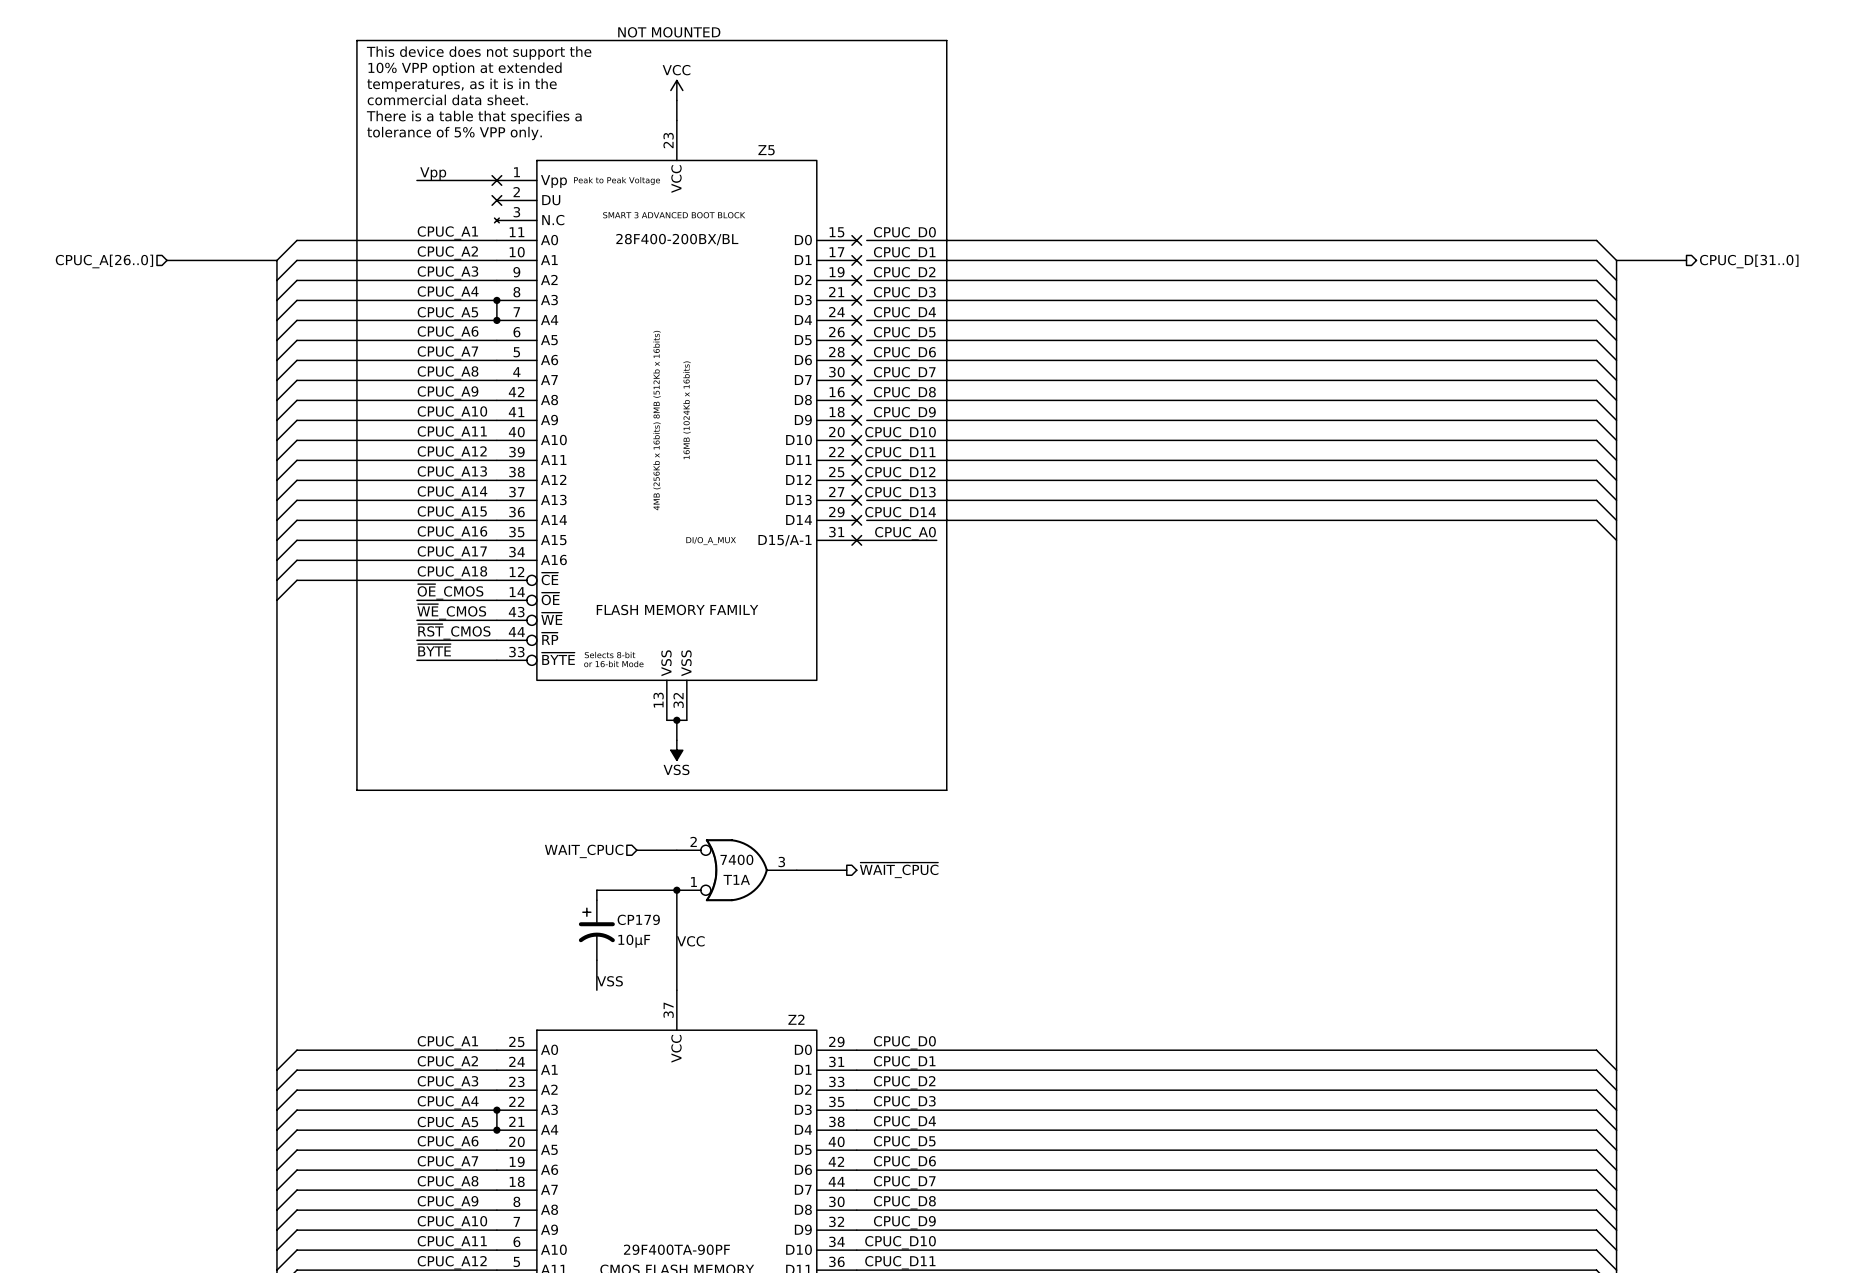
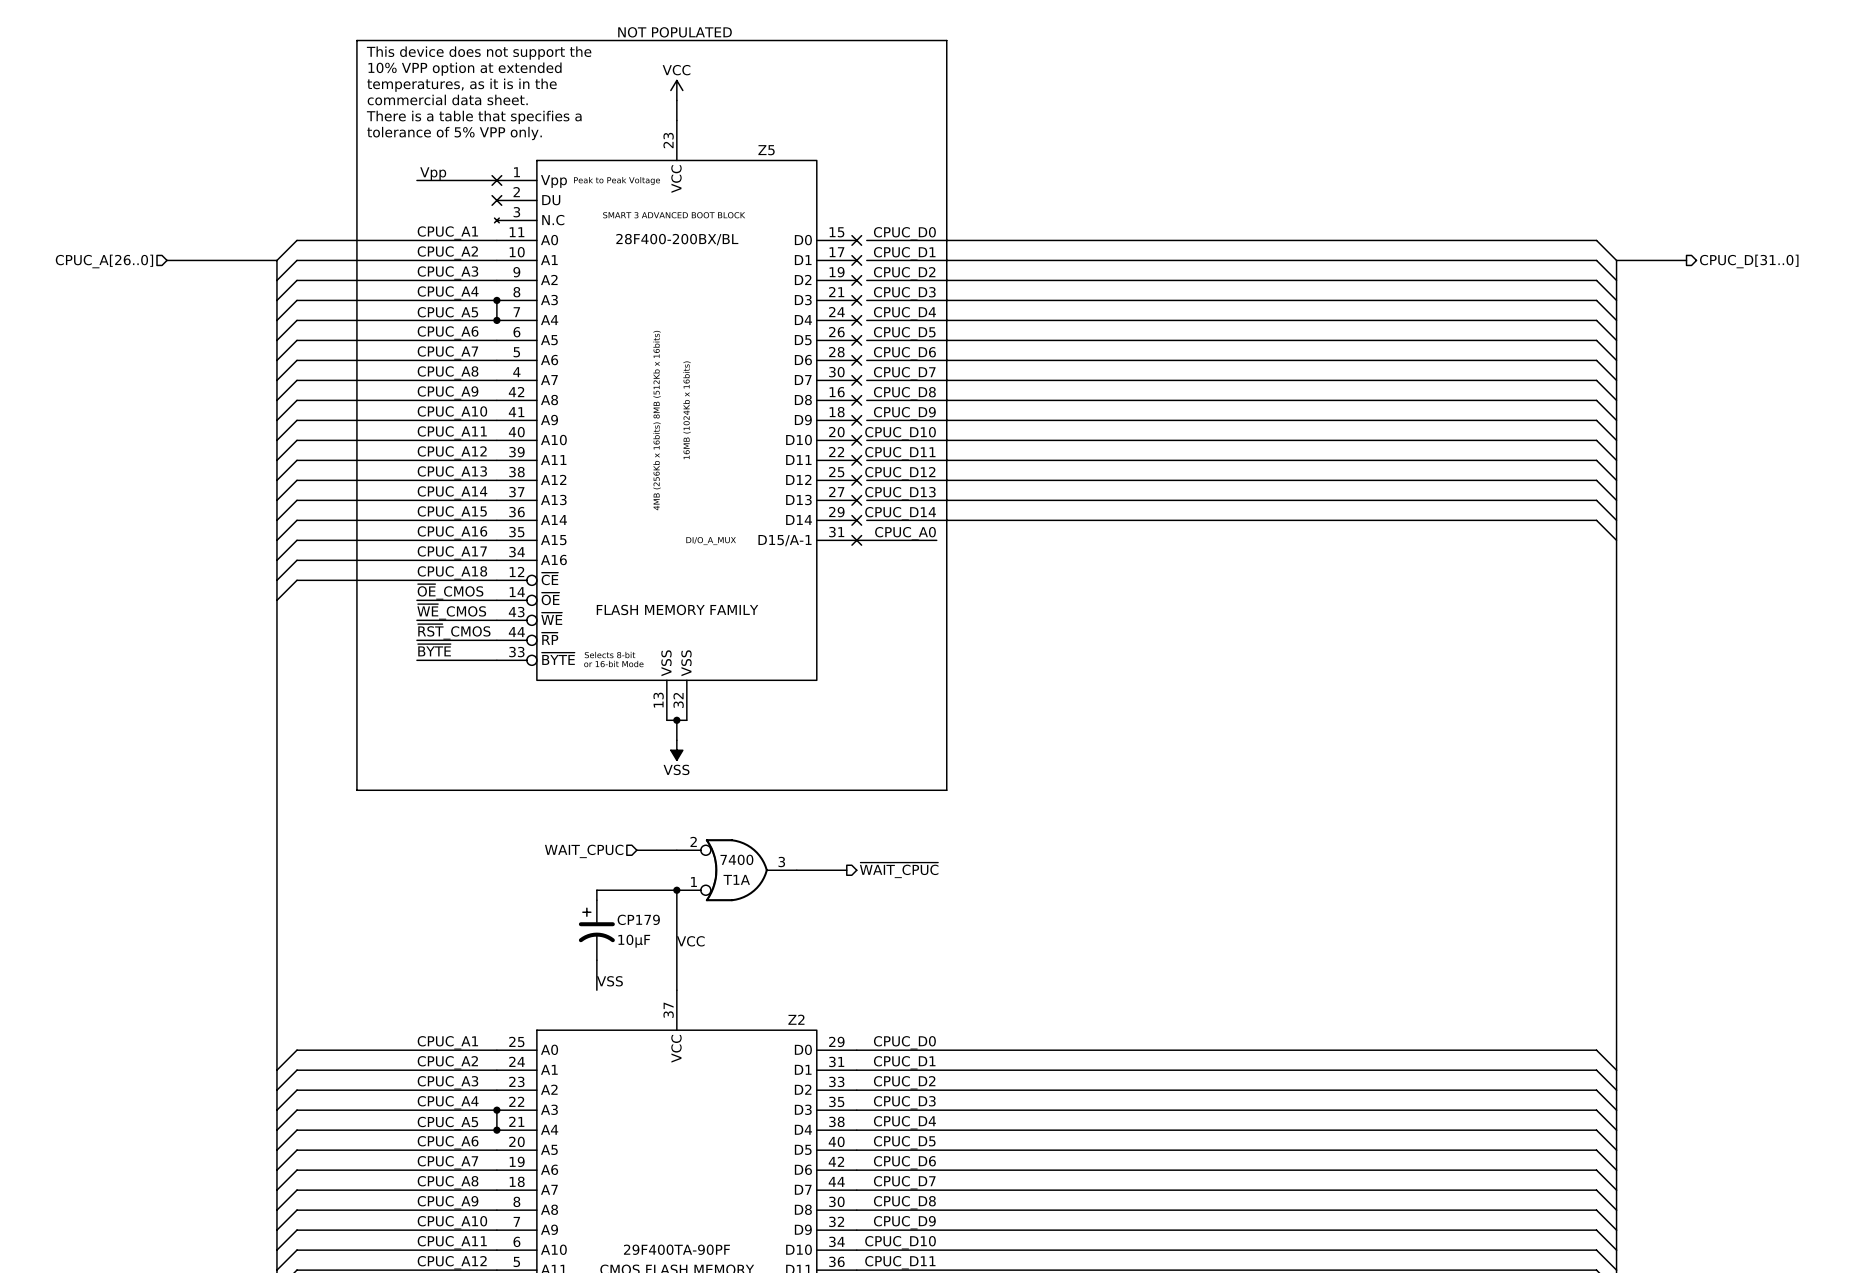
text: NOT MOUNTED (669, 32) -> NOT POPULATED (675, 32)

